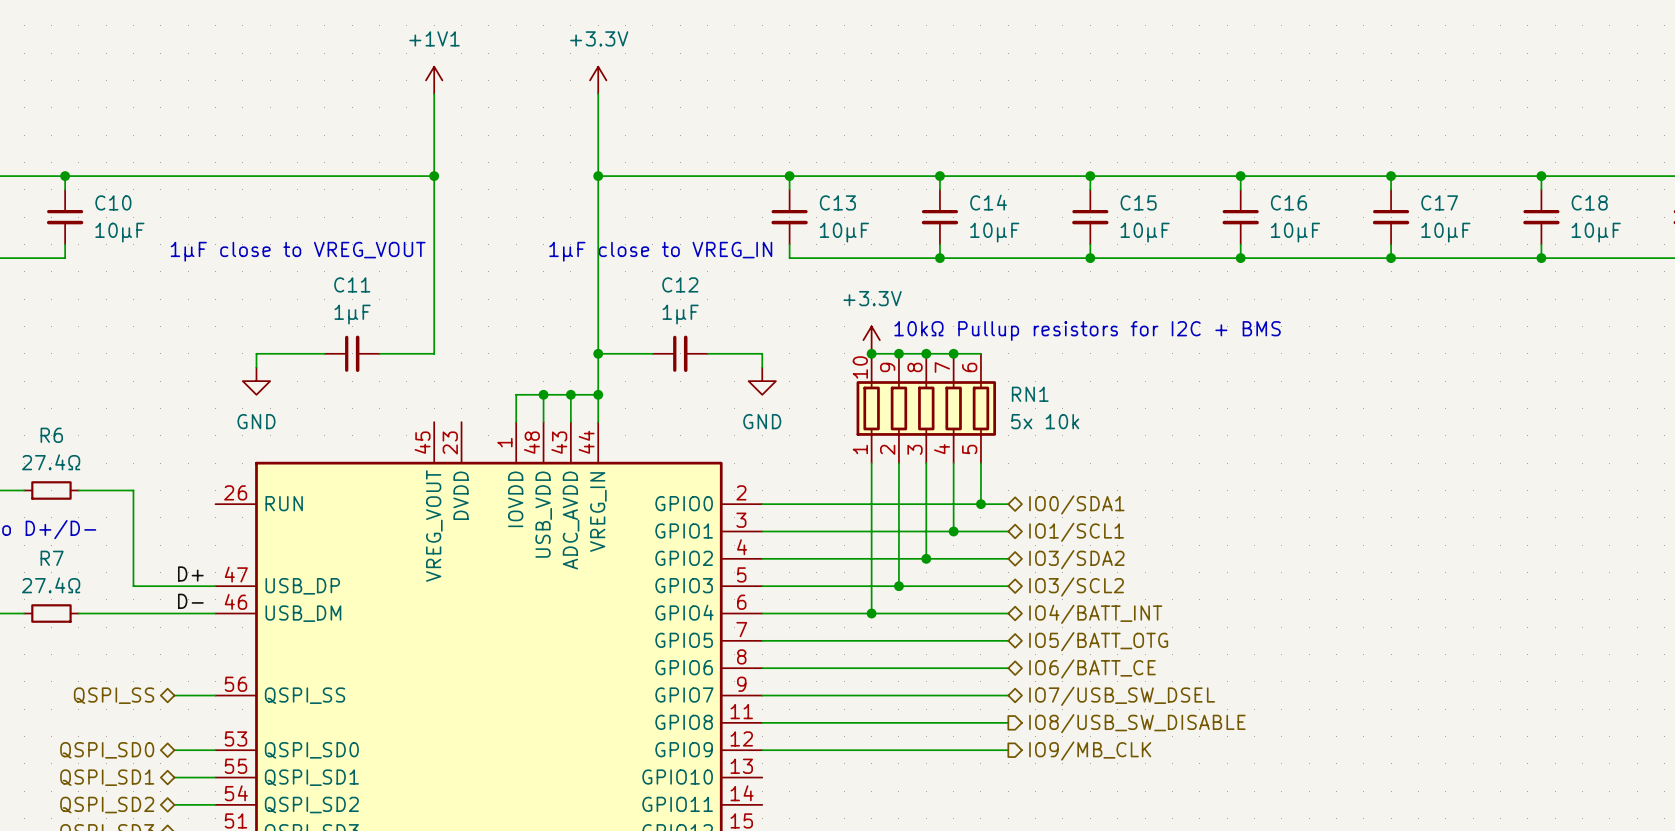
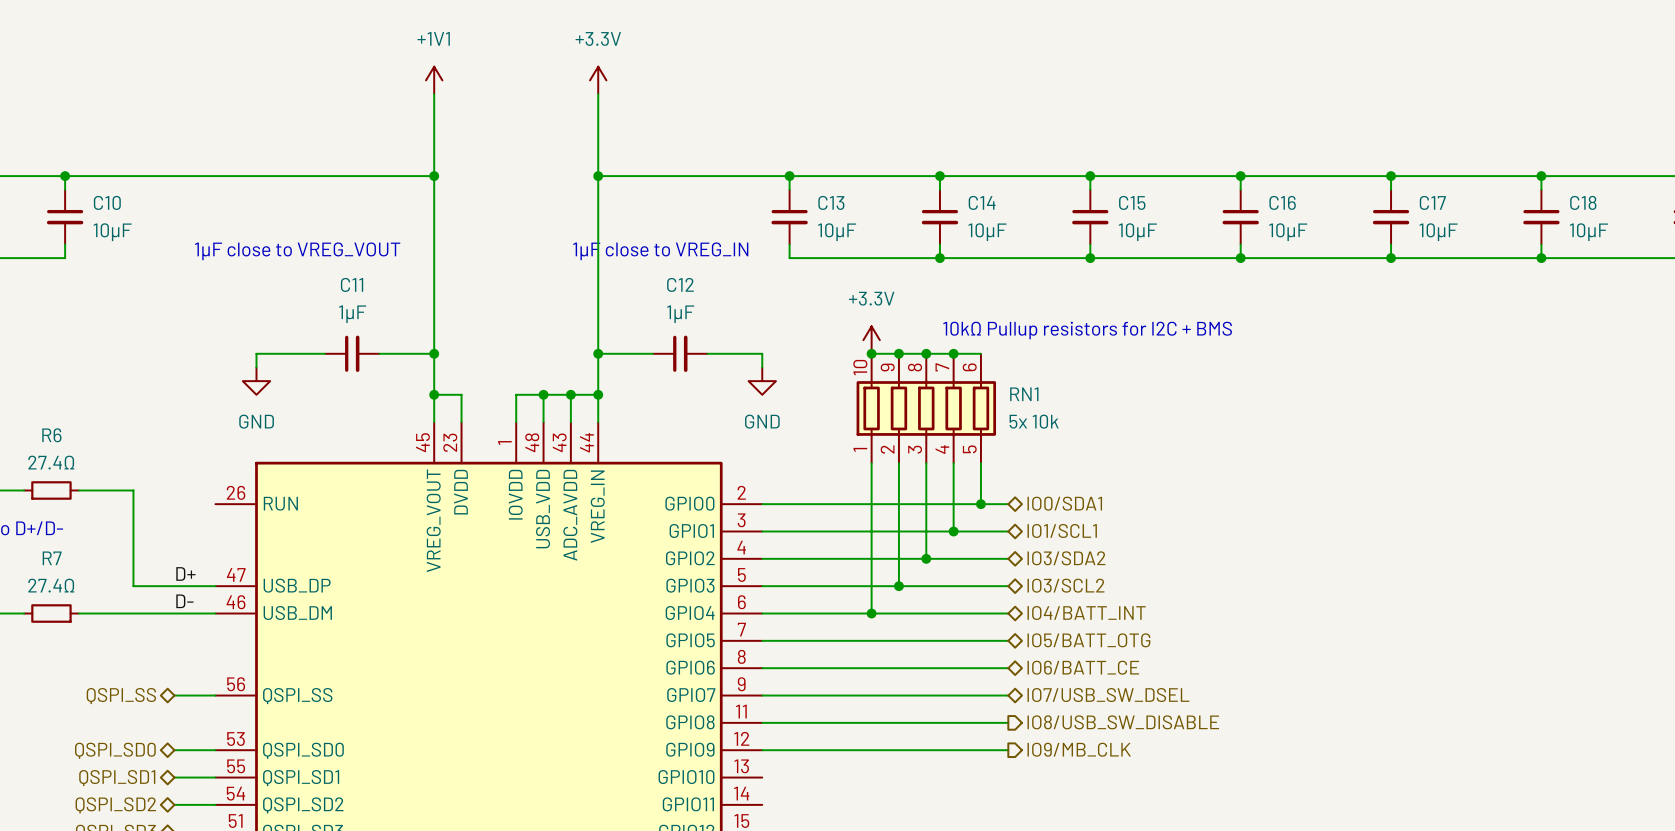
wire: none -> (434, 353) (434, 422)
junction: none -> (434, 353)
wire: none -> (434, 394) (461, 394) (461, 422)
junction: none -> (434, 394)

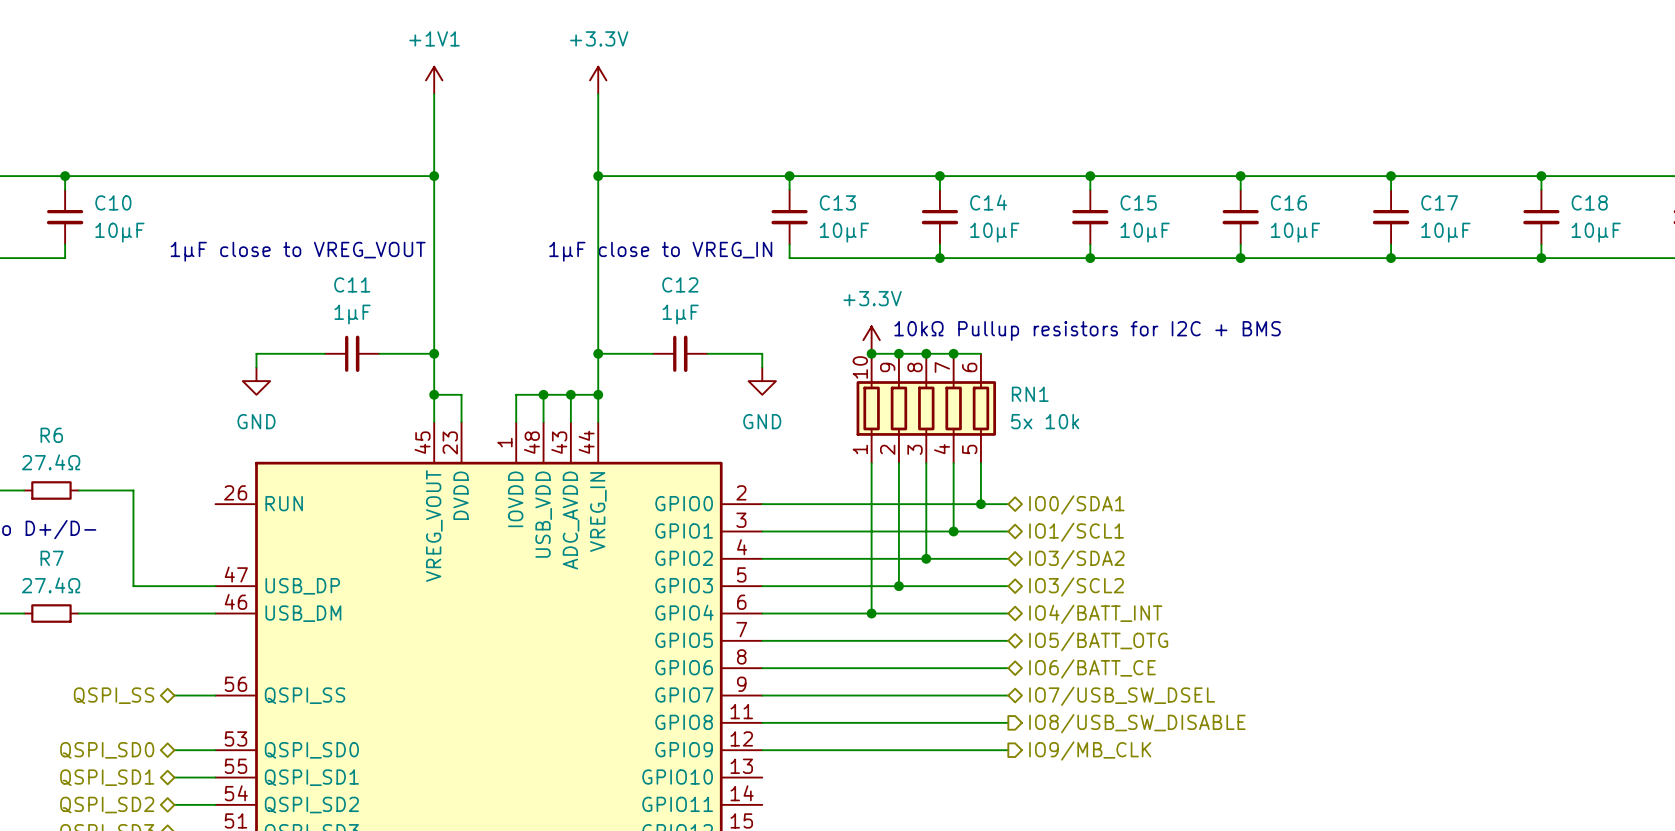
label: D+ (185, 573) -> none
label: D- (184, 601) -> none

